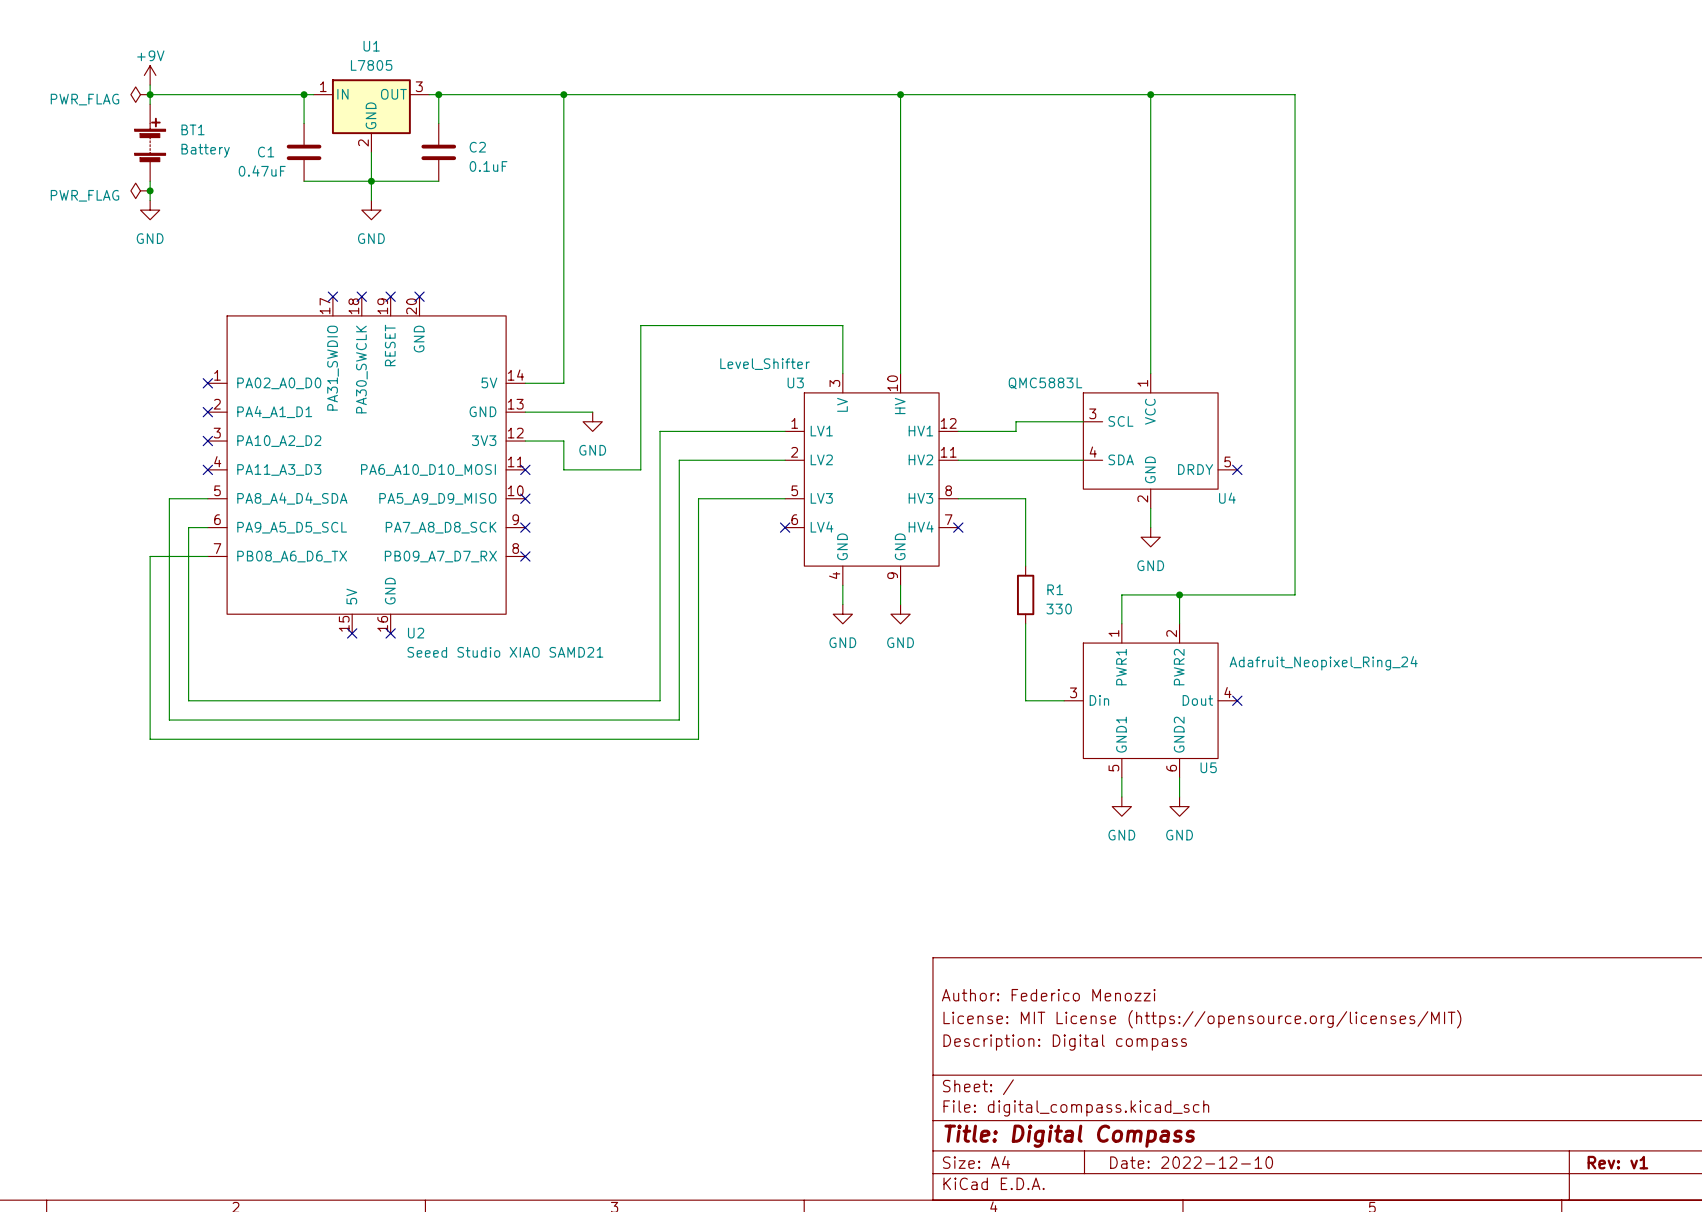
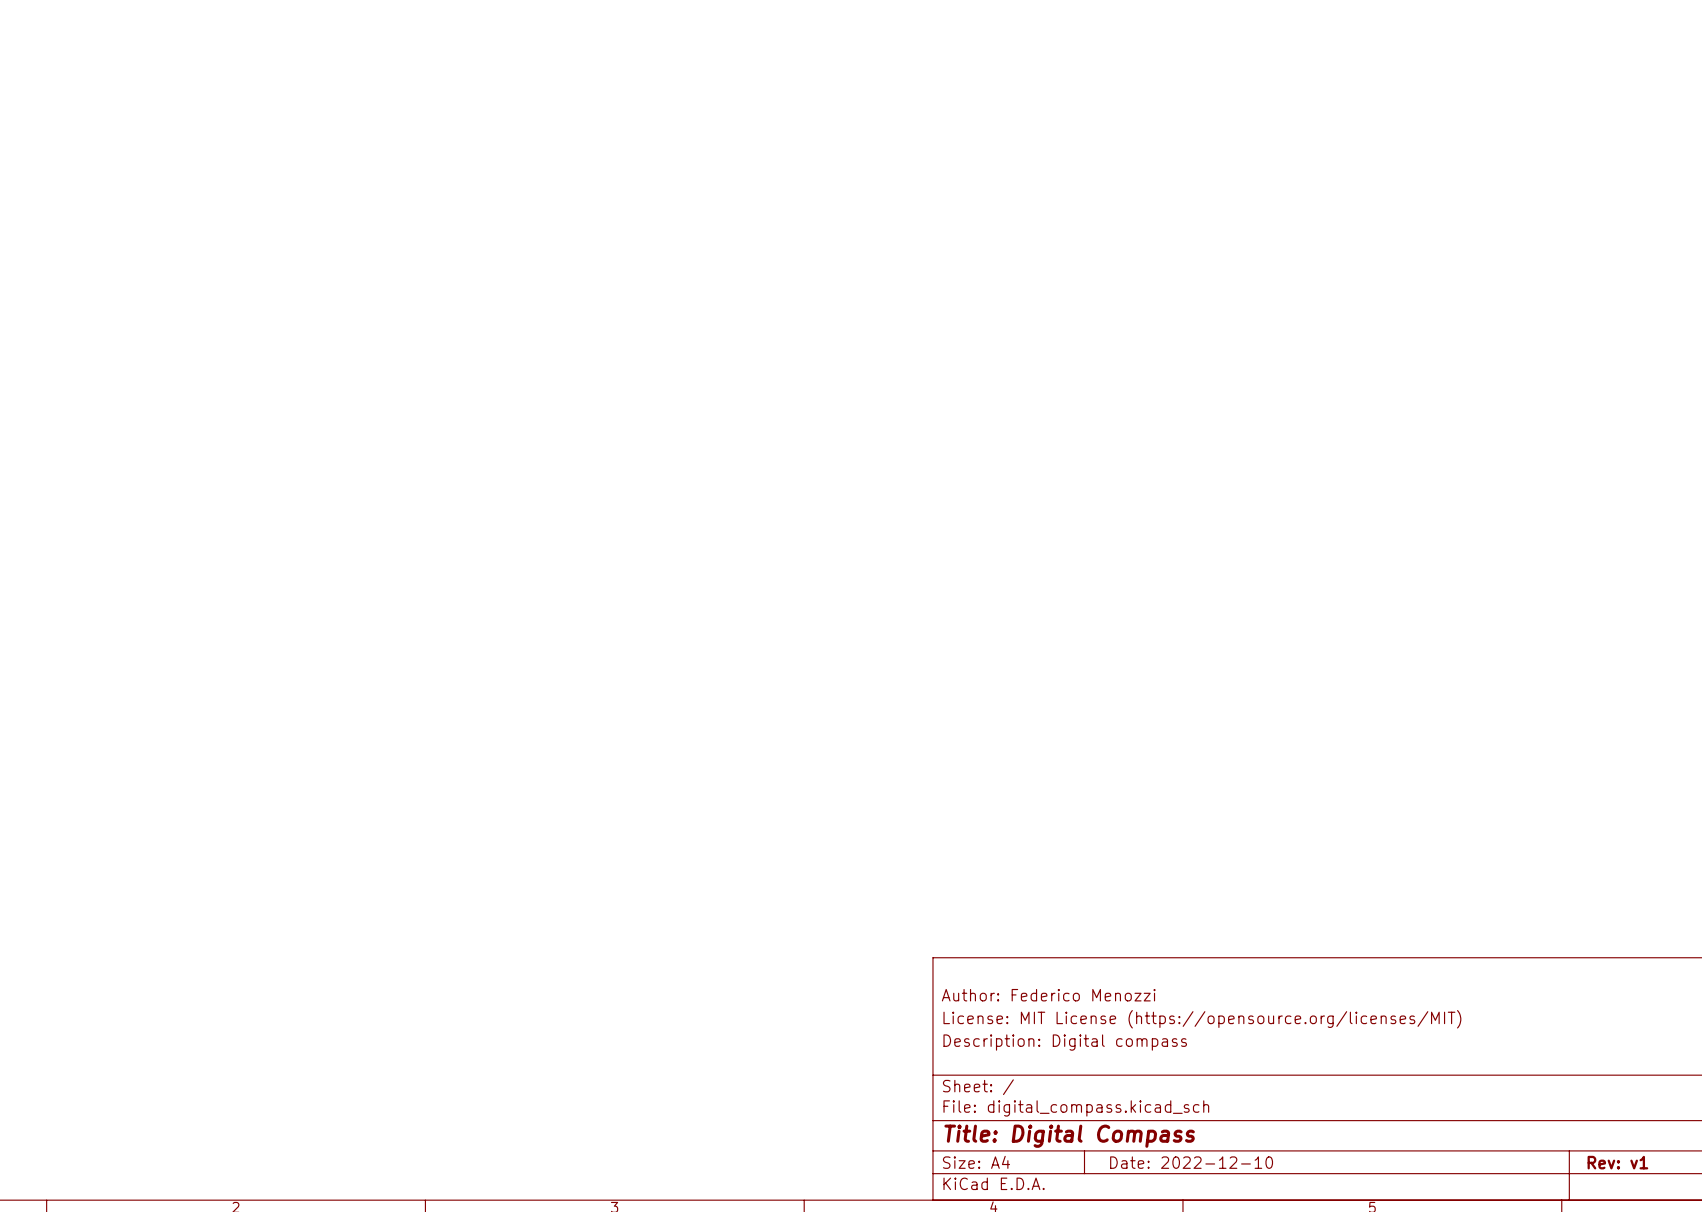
power symbol: +9V (150, 75) -> none
wire: (150, 85) (150, 104) -> none
power symbol: PWR_FLAG (140, 94) -> none
wire: (150, 94) (313, 94) -> none
junction: (150, 94) -> none
wire: (304, 94) (304, 123) -> none
junction: (304, 94) -> none
wire: (429, 94) (1295, 94) (1295, 594) (1121, 594) (1121, 623) -> none
wire: (438, 94) (438, 123) -> none
junction: (438, 94) -> none
wire: (563, 94) (563, 383) (525, 383) -> none
junction: (563, 94) -> none
wire: (900, 94) (900, 373) -> none
junction: (900, 94) -> none
wire: (1150, 94) (1150, 373) -> none
junction: (1150, 94) -> none
U1: L7805 (371, 115) -> none
BT1: Battery (150, 142) -> none
C1: 0.47uF (304, 152) -> none
wire: (371, 152) (371, 200) -> none
C2: 0.1uF (438, 152) -> none
wire: (150, 181) (150, 200) -> none
wire: (304, 181) (438, 181) -> none
junction: (371, 181) -> none
power symbol: PWR_FLAG (140, 190) -> none
junction: (150, 190) -> none
power symbol: GND (150, 210) -> none
power symbol: GND (371, 210) -> none
no-connect mark: (332, 296) -> none
no-connect mark: (361, 296) -> none
no-connect mark: (390, 296) -> none
no-connect mark: (419, 296) -> none
wire: (842, 373) (842, 325) (640, 325) (640, 469) (563, 469) (563, 441) (525, 441) -> none
no-connect mark: (207, 383) -> none
no-connect mark: (207, 412) -> none
wire: (525, 412) (592, 412) -> none
power symbol: GND (592, 421) -> none
wire: (1083, 421) (1016, 421) (1016, 431) (958, 431) -> none
wire: (785, 431) (660, 431) (660, 700) (188, 700) (188, 527) (207, 527) -> none
no-connect mark: (207, 441) -> none
U4: QMC5883L (1160, 441) -> none
wire: (785, 460) (679, 460) (679, 720) (169, 720) (169, 498) (207, 498) -> none
wire: (958, 460) (1083, 460) -> none
U2: Seeed Studio XIAO SAMD21 (366, 465) -> none
no-connect mark: (207, 469) -> none
no-connect mark: (525, 469) -> none
no-connect mark: (1237, 469) -> none
U3: Level_Shifter (871, 479) -> none
no-connect mark: (525, 498) -> none
wire: (785, 498) (698, 498) (698, 739) (150, 739) (150, 556) (207, 556) -> none
wire: (958, 498) (1025, 498) (1025, 566) -> none
wire: (1150, 508) (1150, 527) -> none
no-connect mark: (525, 527) -> none
no-connect mark: (785, 527) -> none
no-connect mark: (958, 527) -> none
power symbol: GND (1150, 537) -> none
no-connect mark: (525, 556) -> none
wire: (842, 585) (842, 604) -> none
wire: (900, 585) (900, 604) -> none
R1: 330 (1025, 594) -> none
wire: (1179, 594) (1179, 623) -> none
junction: (1179, 594) -> none
power symbol: GND (842, 614) -> none
power symbol: GND (900, 614) -> none
wire: (1025, 623) (1025, 700) (1064, 700) -> none
no-connect mark: (352, 633) -> none
no-connect mark: (390, 633) -> none
U5: Adafruit_Neopixel_Ring_24 (1150, 700) -> none
no-connect mark: (1237, 700) -> none
wire: (1121, 777) (1121, 796) -> none
wire: (1179, 777) (1179, 796) -> none
power symbol: GND (1121, 806) -> none
power symbol: GND (1179, 806) -> none

